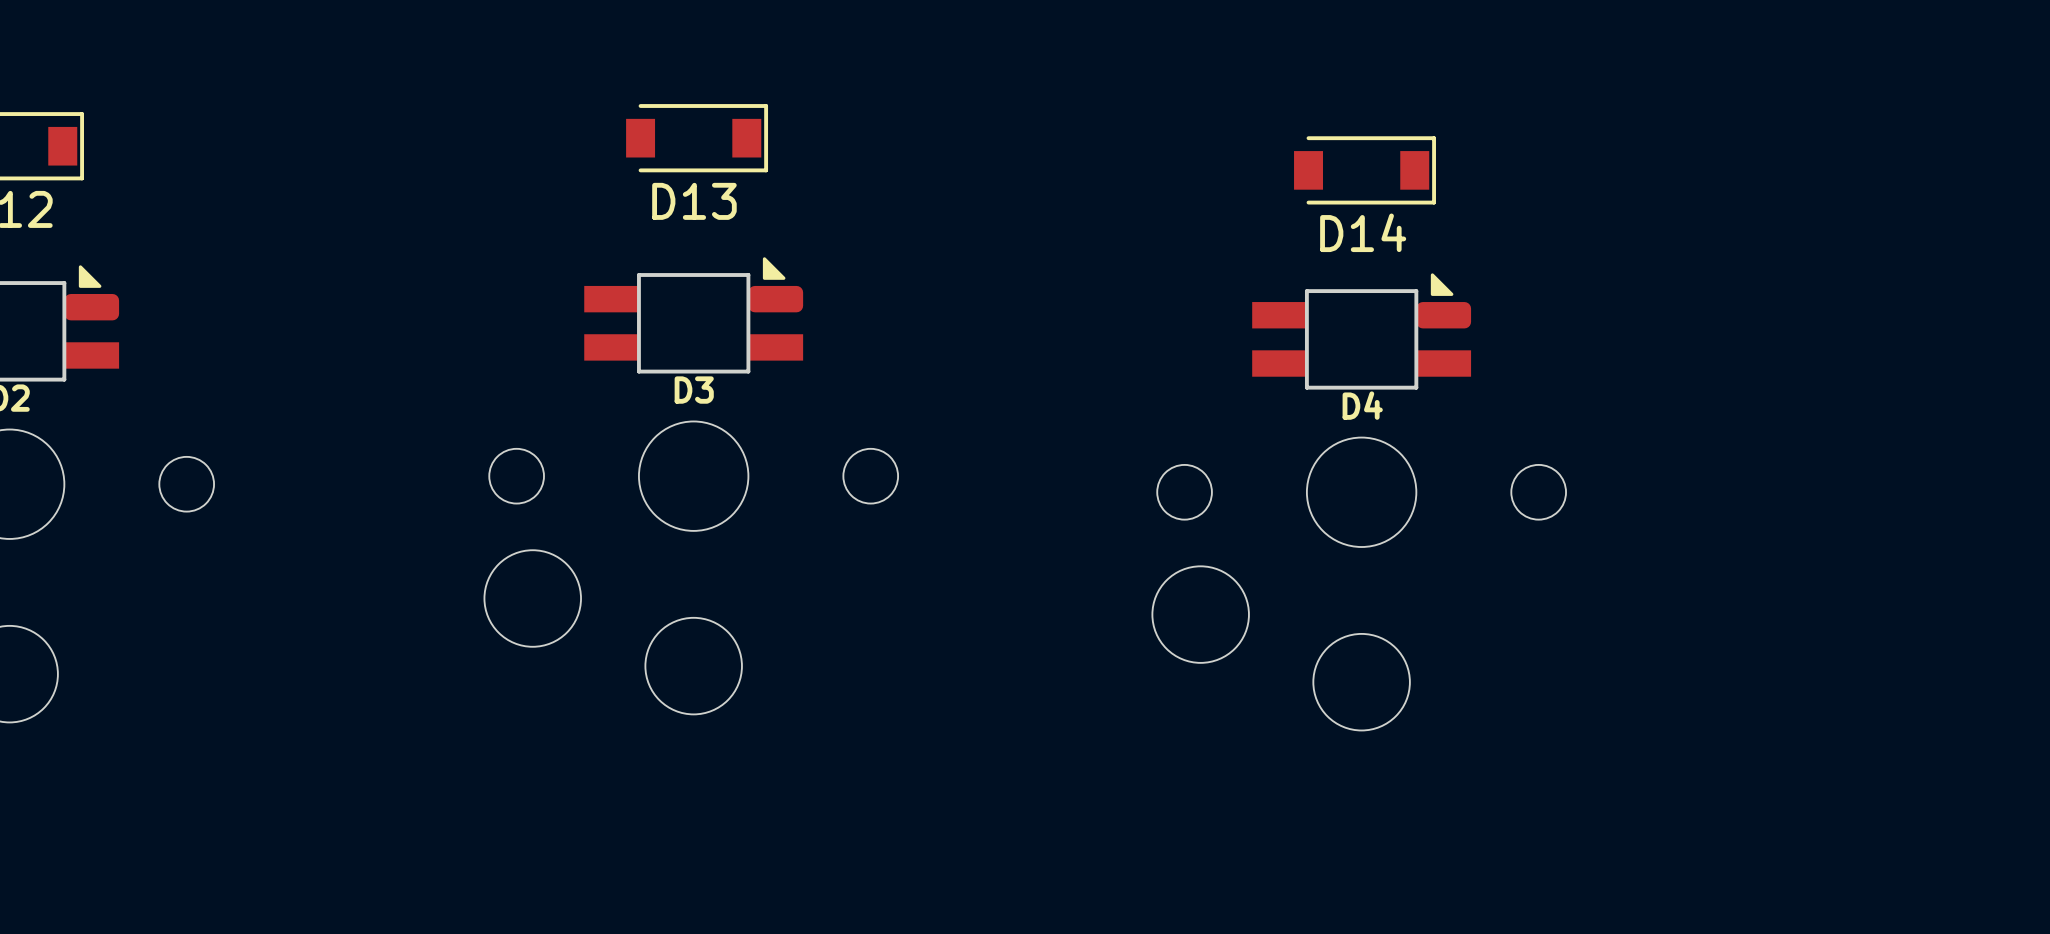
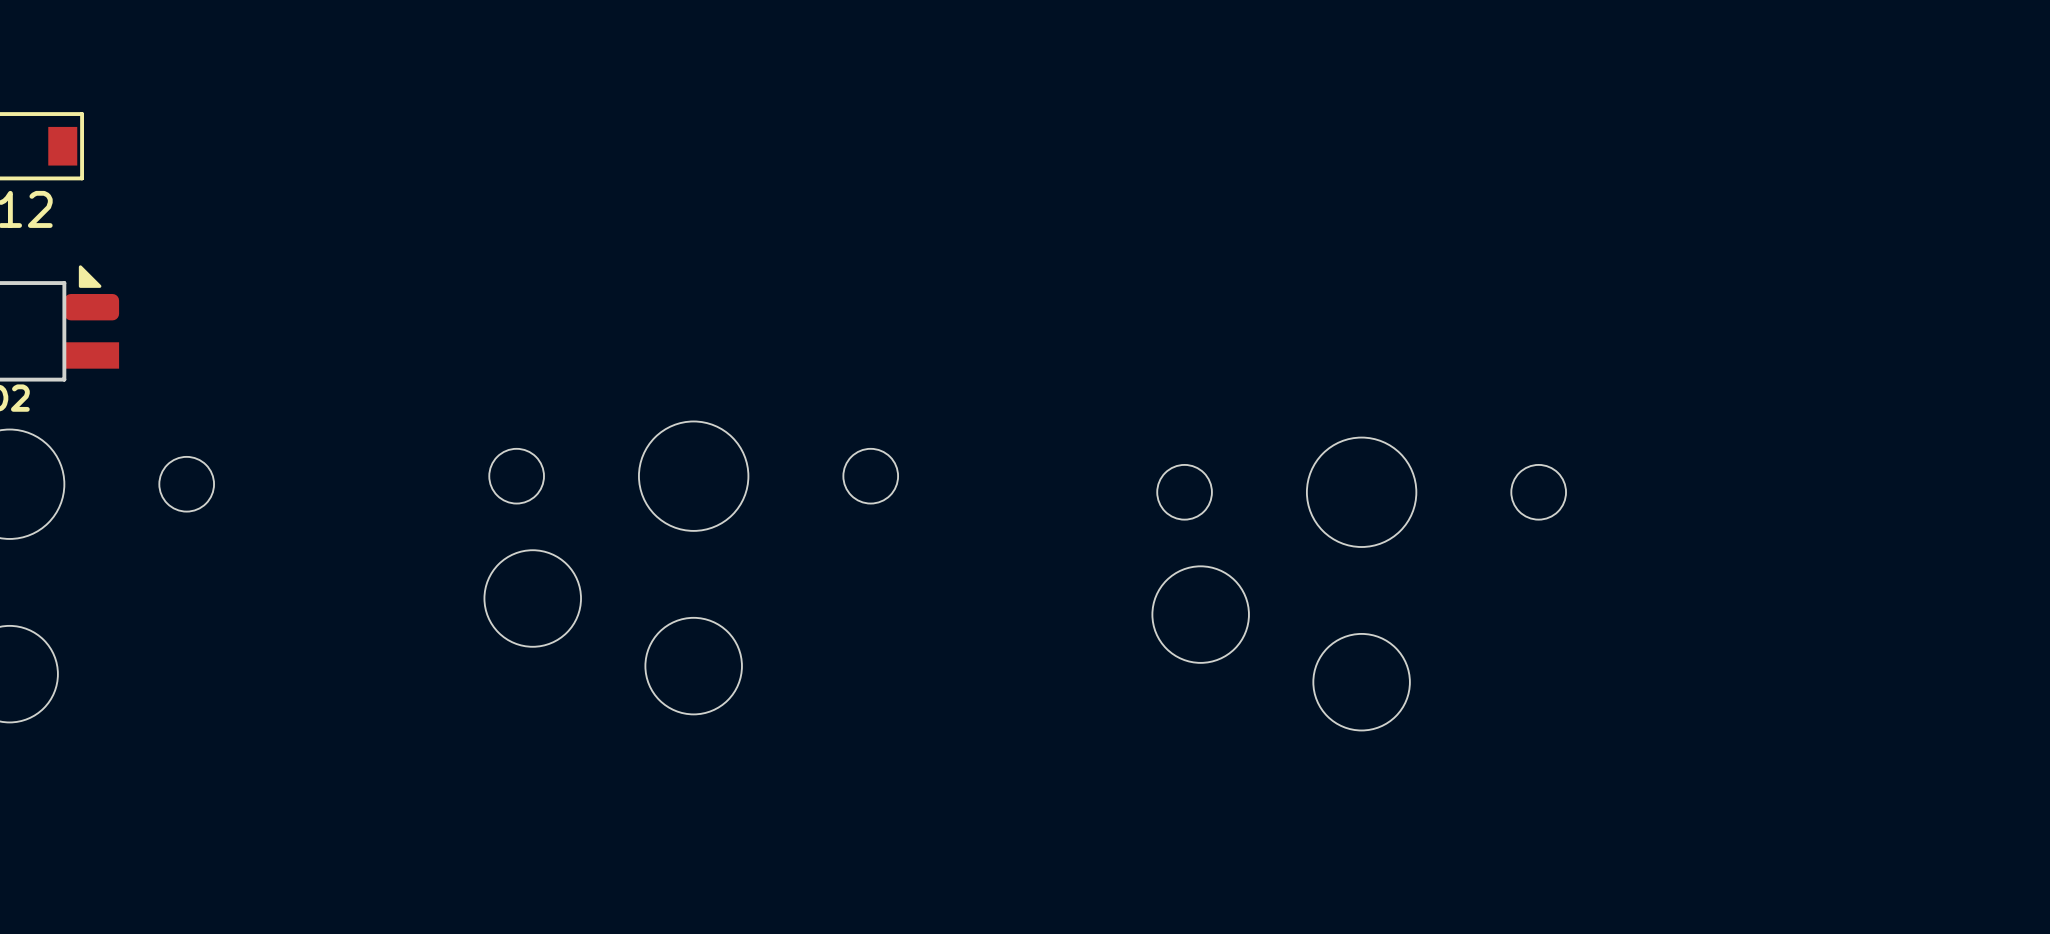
D13: (697, 138) -> none
D14: (1365, 170) -> none
D3: (693, 315) -> none
D4: (1361, 331) -> none

